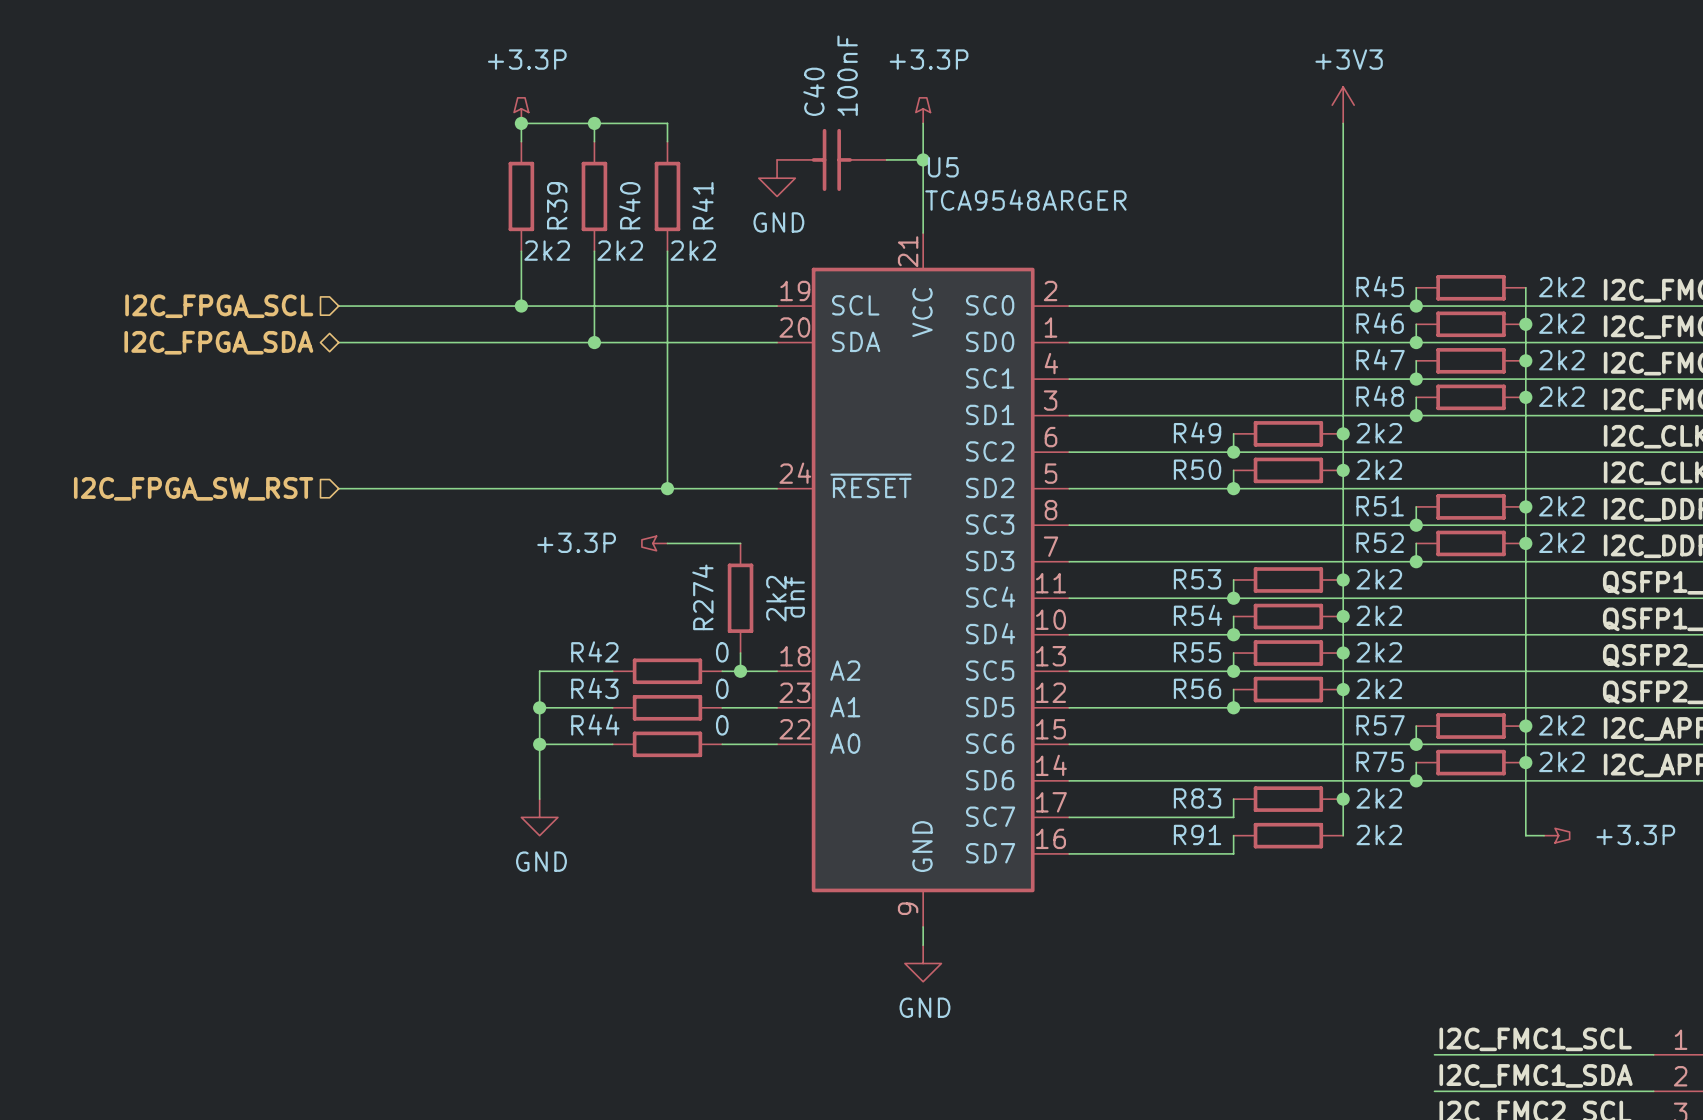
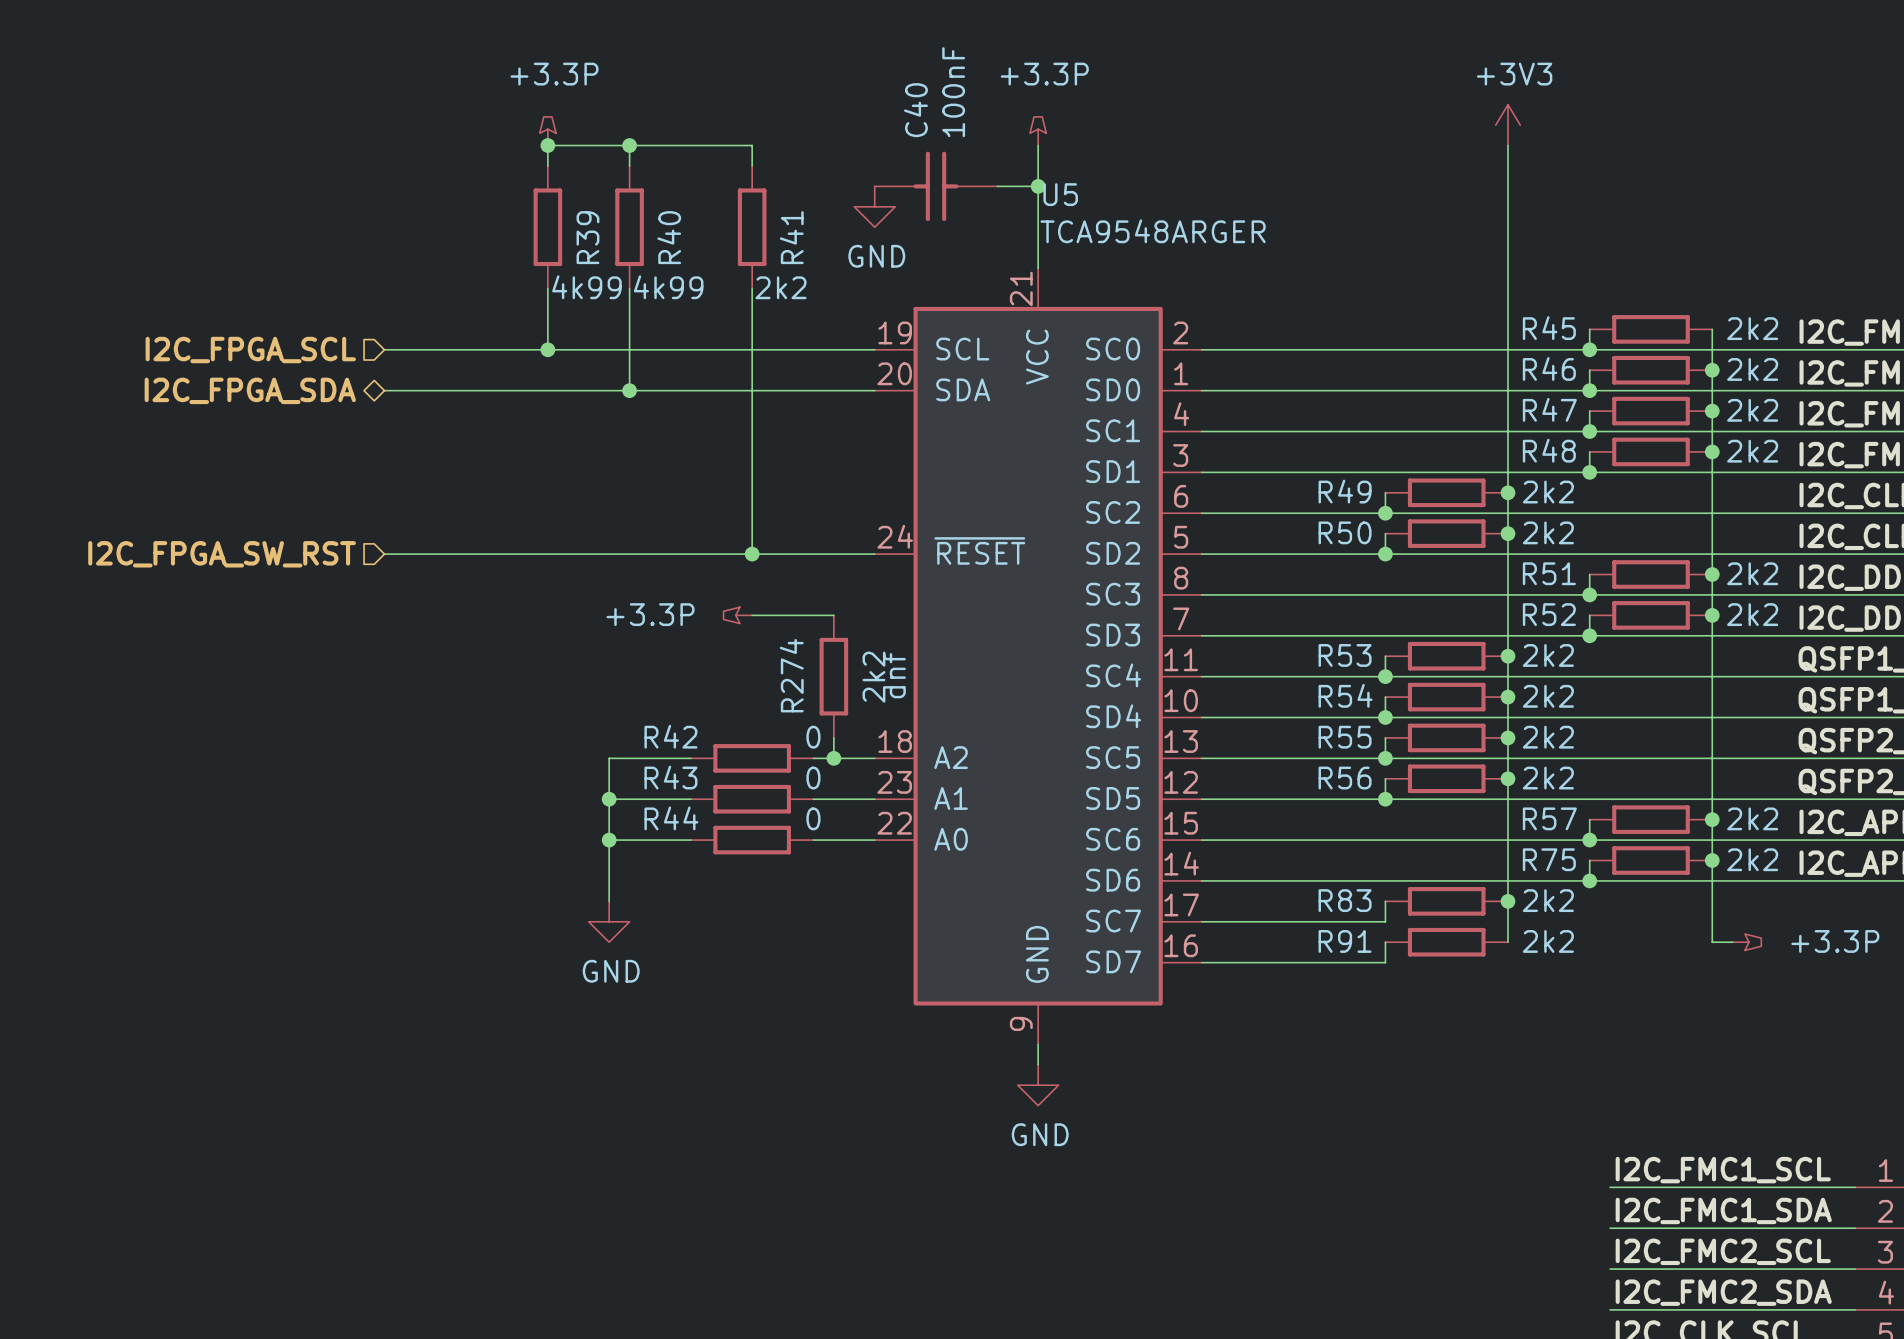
power symbol position: +3.3P (521, 110) -> +3.3P (547, 131)
junction: none -> (547, 145)
wire: (521, 123) (521, 141) -> (588, 145) (547, 145) (547, 165)
junction: (521, 123) -> none
junction: none -> (629, 145)
wire: (594, 123) (594, 141) -> (629, 145) (629, 165)
junction: (594, 123) -> none
R39 position: (521, 196) -> (547, 227)
R40 position: (594, 196) -> (629, 227)
R39 text: 2k2 (547, 250) -> 4k99 (586, 287)
R40 text: 2k2 (620, 250) -> 4k99 (668, 287)
wire: (521, 251) (521, 306) -> (547, 288) (547, 349)
wire: (594, 251) (594, 342) -> (629, 288) (629, 390)
junction: none -> (547, 349)
junction: (521, 306) -> none
junction: none -> (629, 390)
junction: (594, 342) -> none

